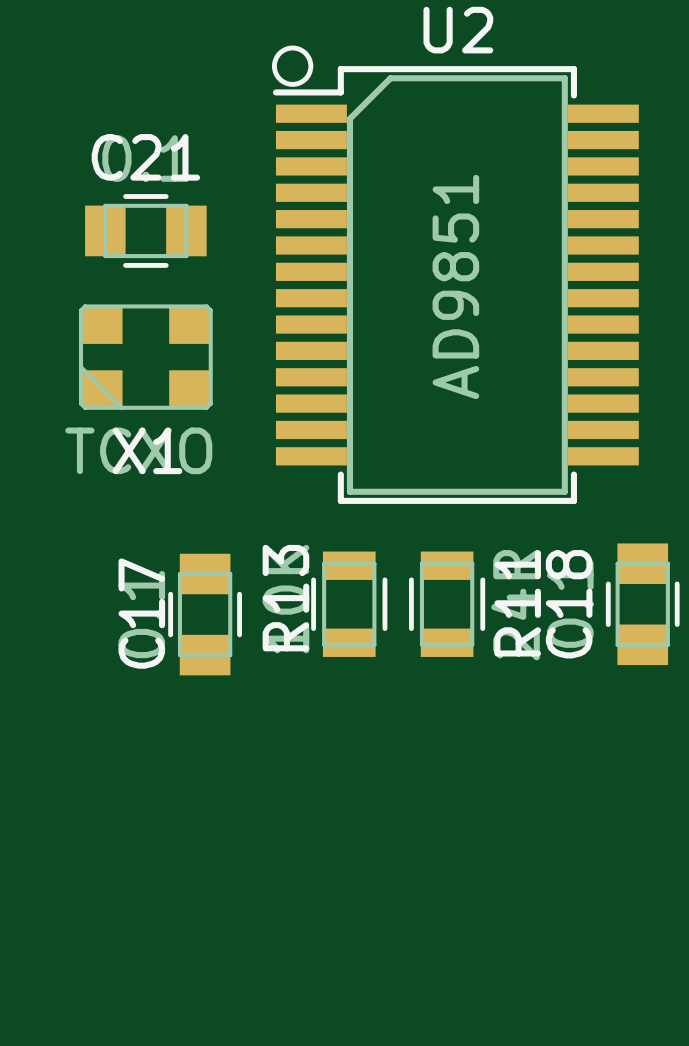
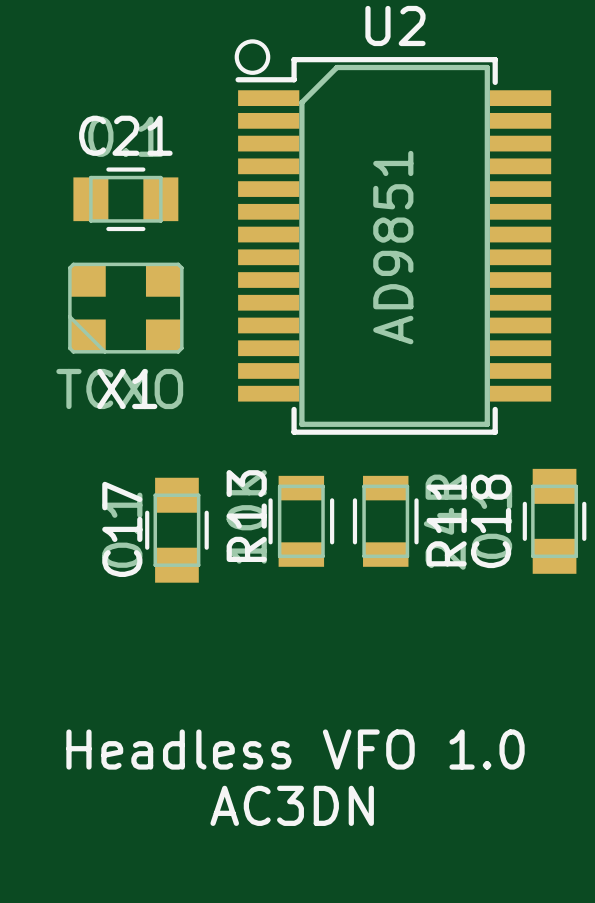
text: none -> Headless VFO 1.0 (295, 749)
text: none -> AC3DN (292, 805)

